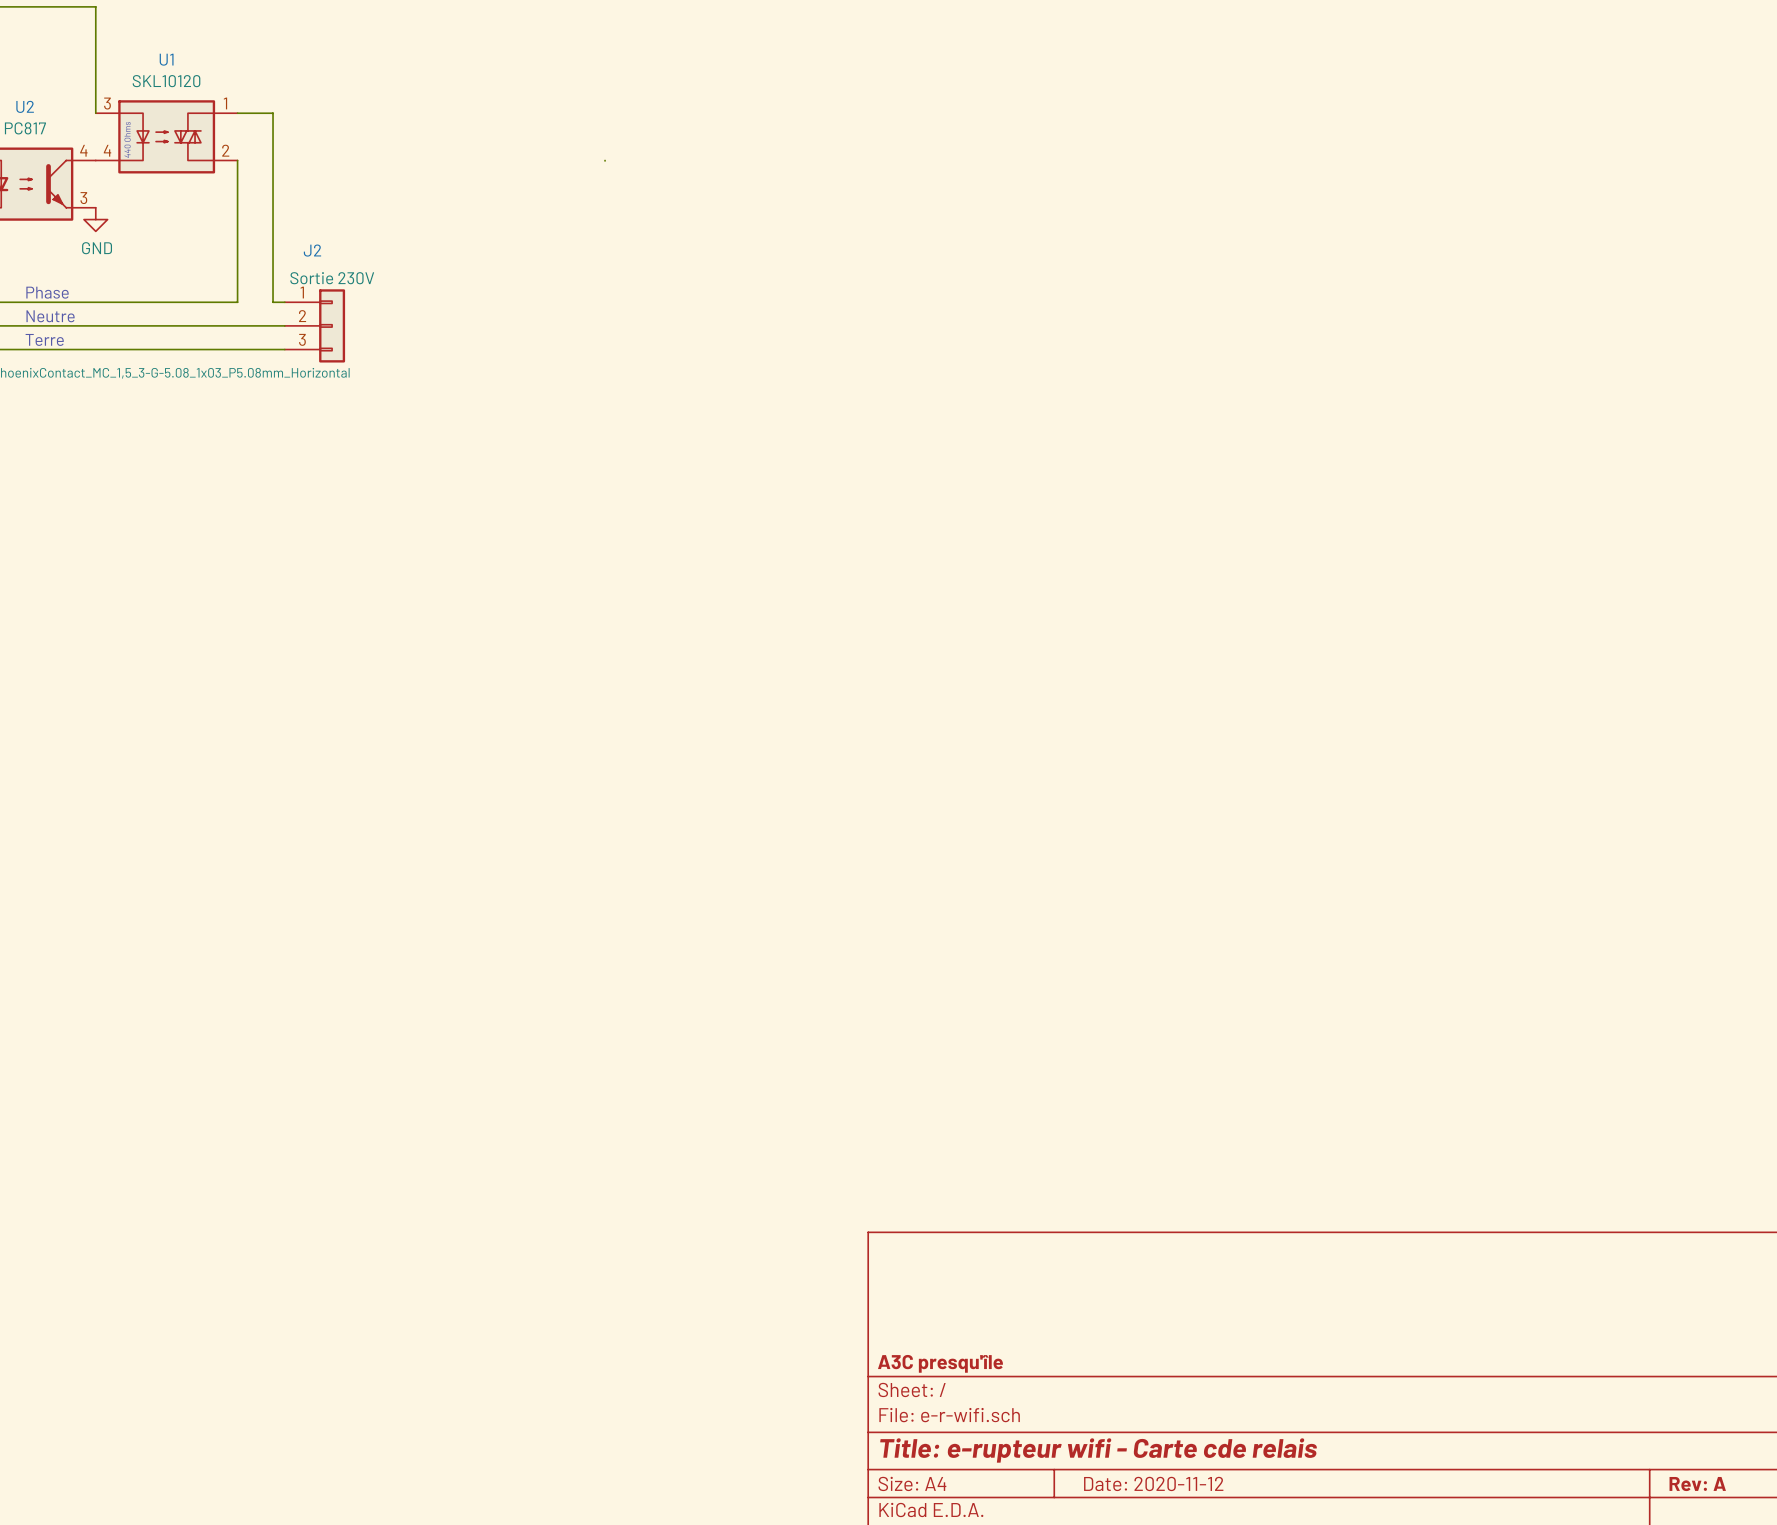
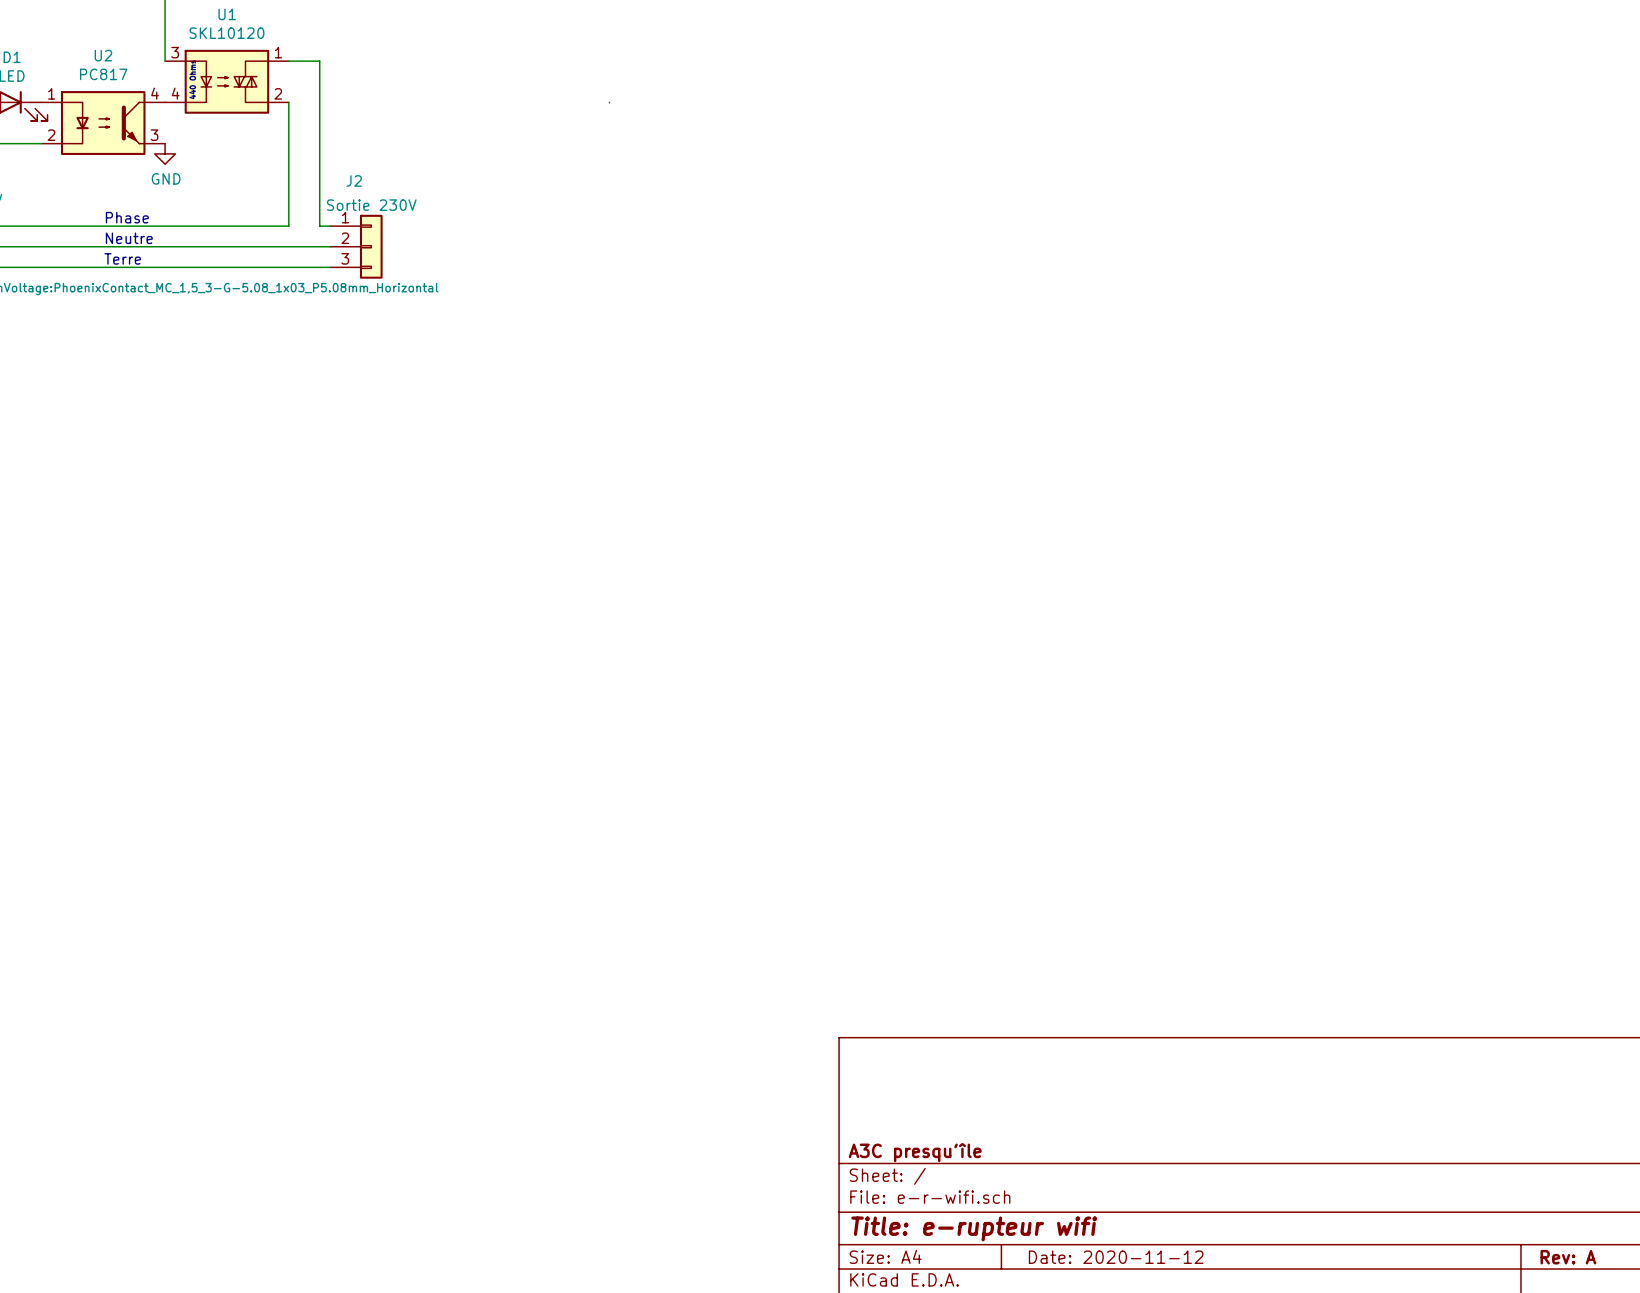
title block: Title: e-rupteur wifi - Carte cde relais (1098, 1450) -> Title: e-rupteur wifi (974, 1228)

